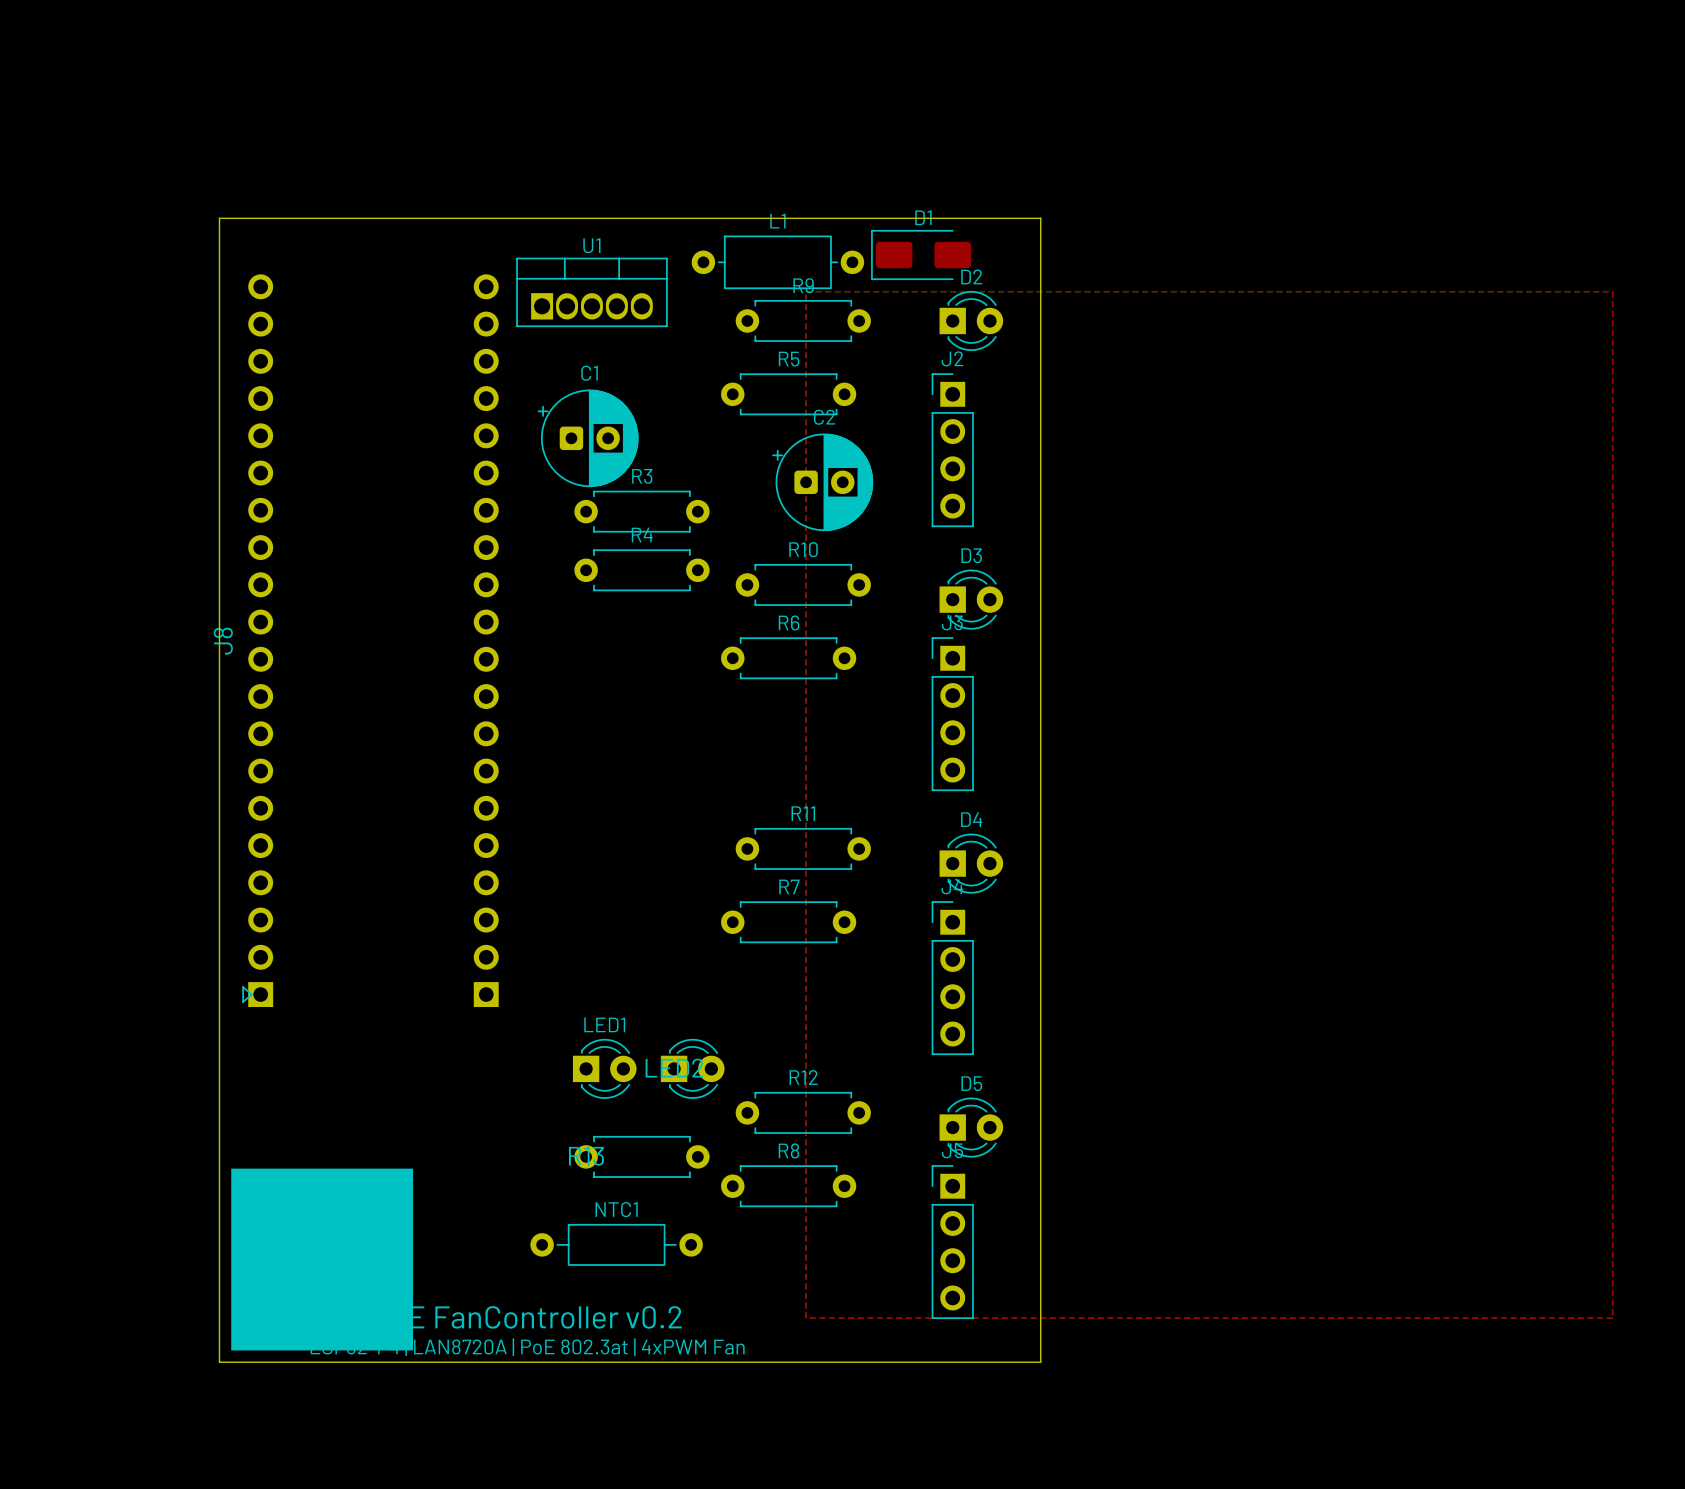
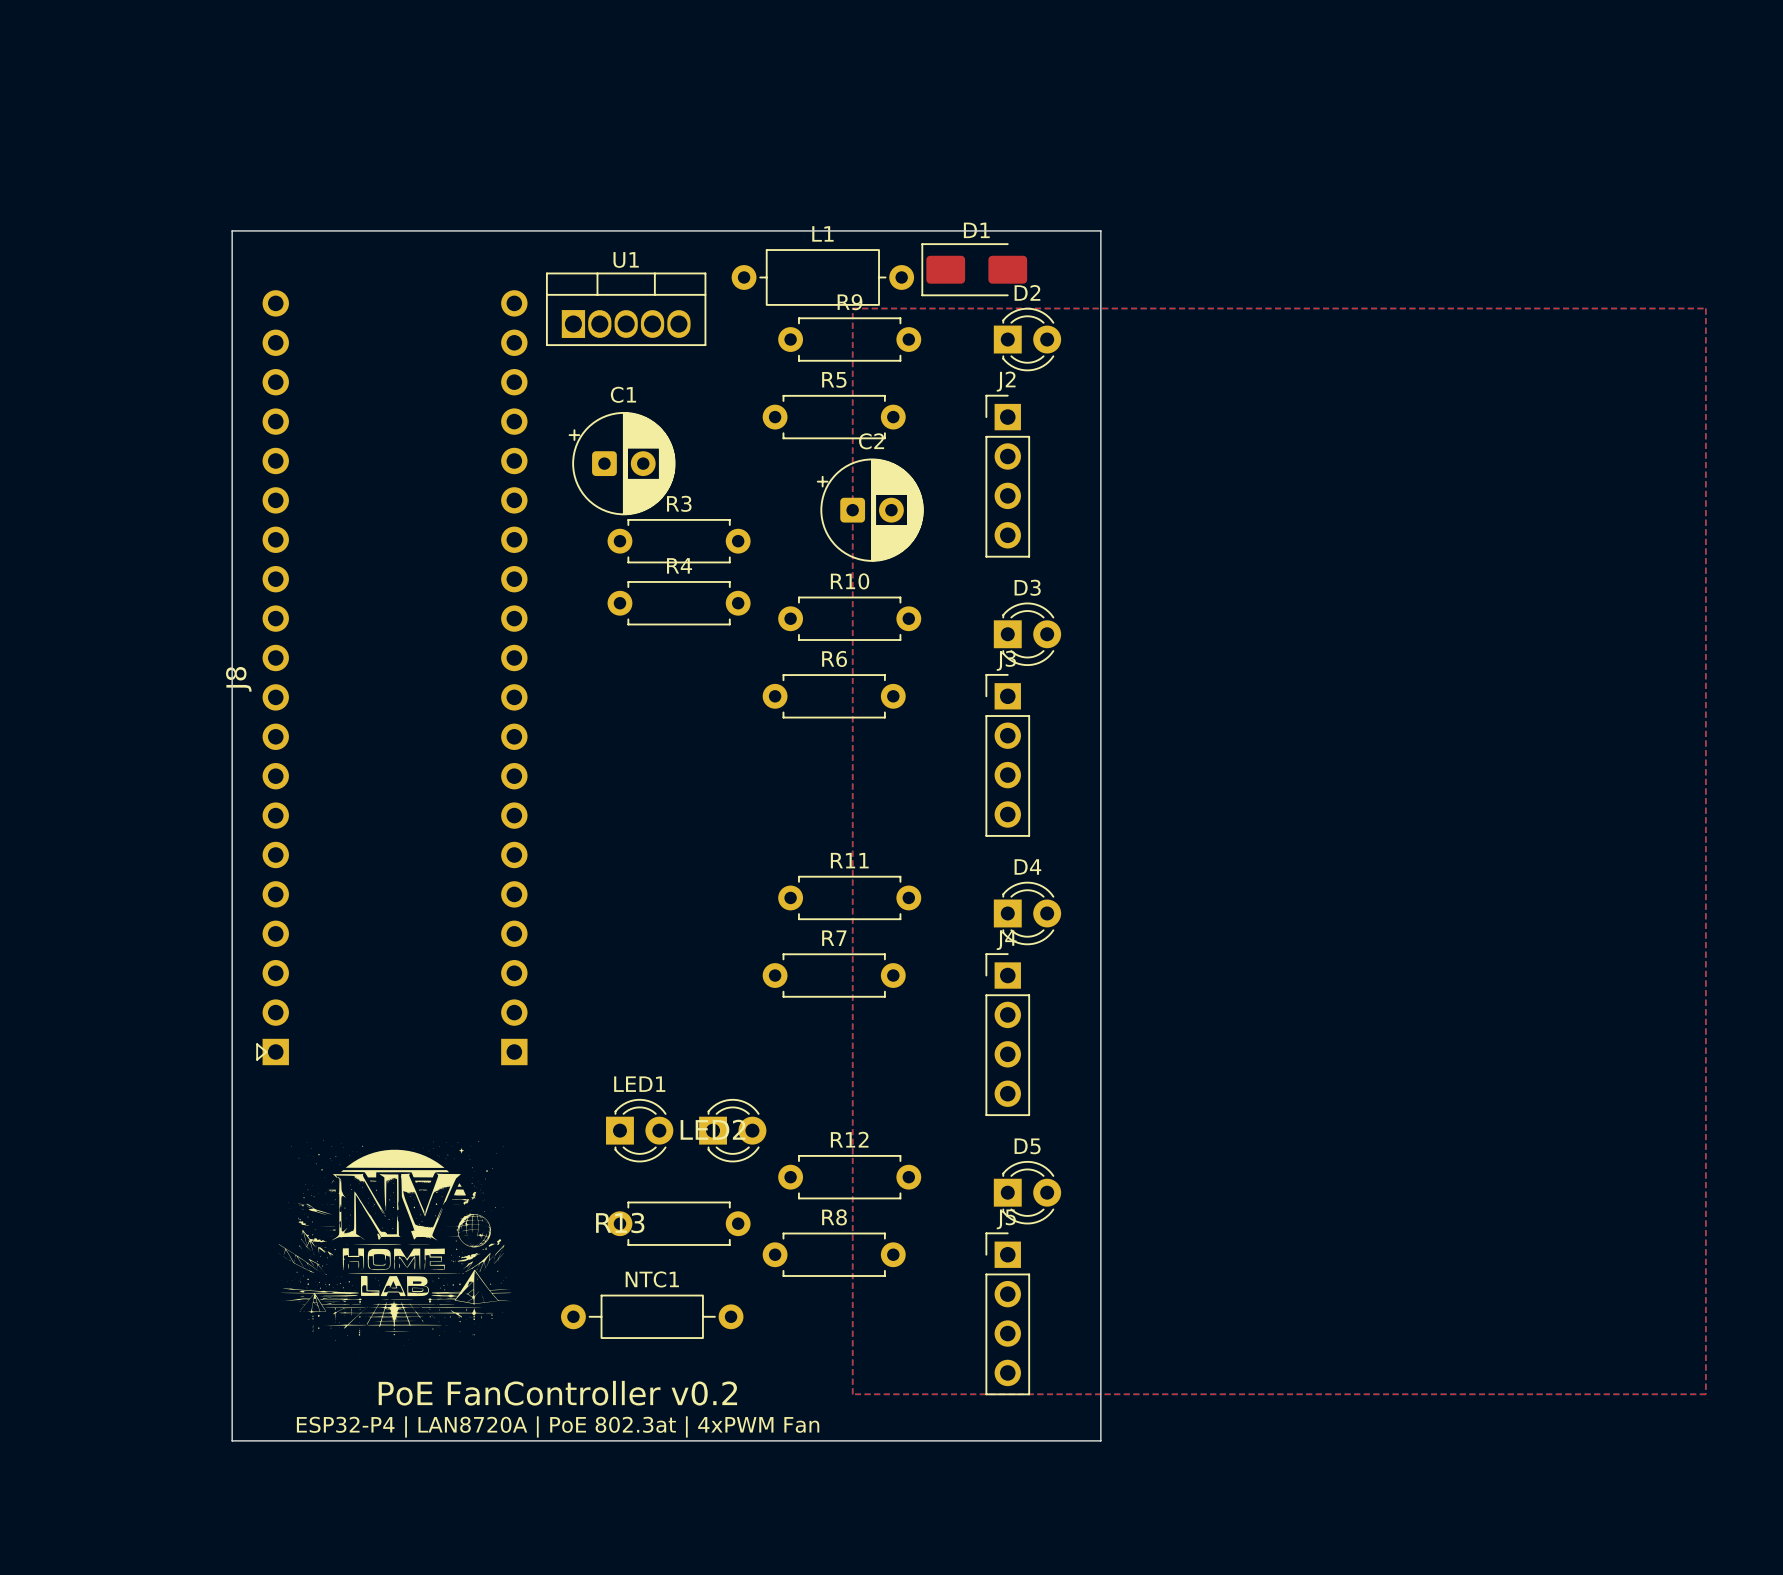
drawing: none -> [278, 1138, 512, 1355]
drawing: [231, 1168, 414, 1351] -> none

